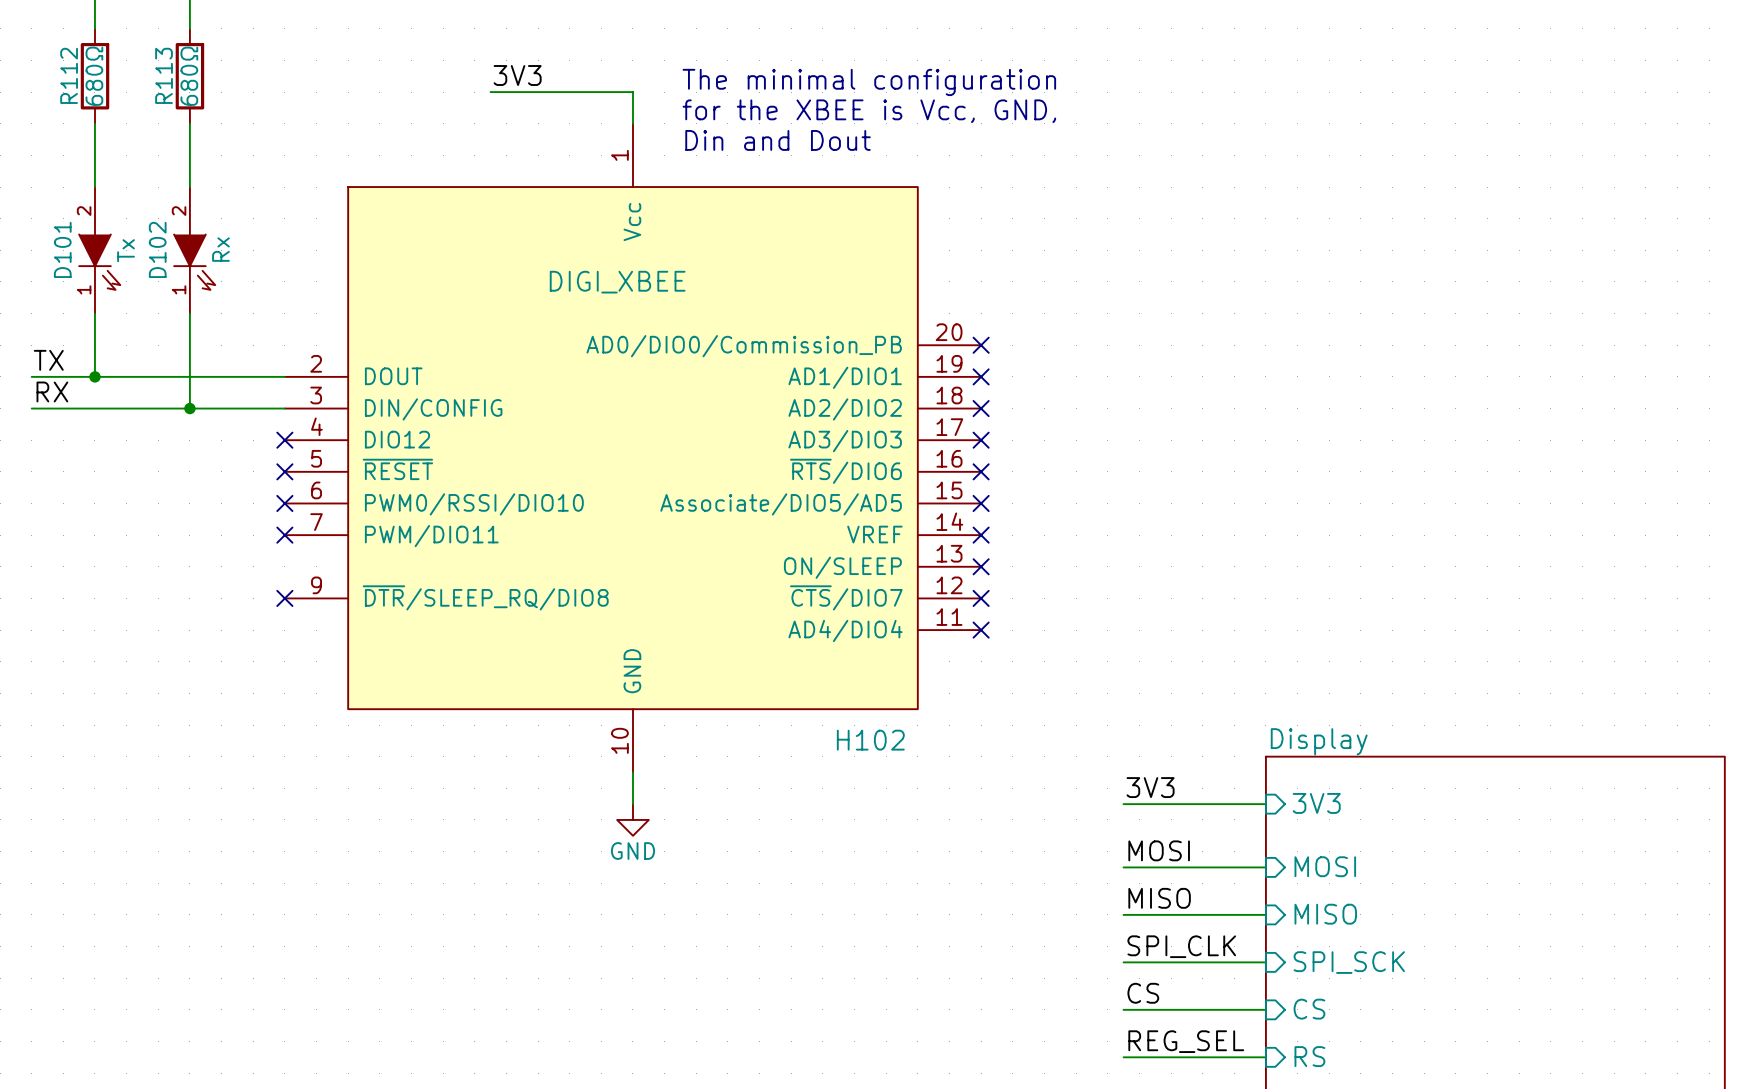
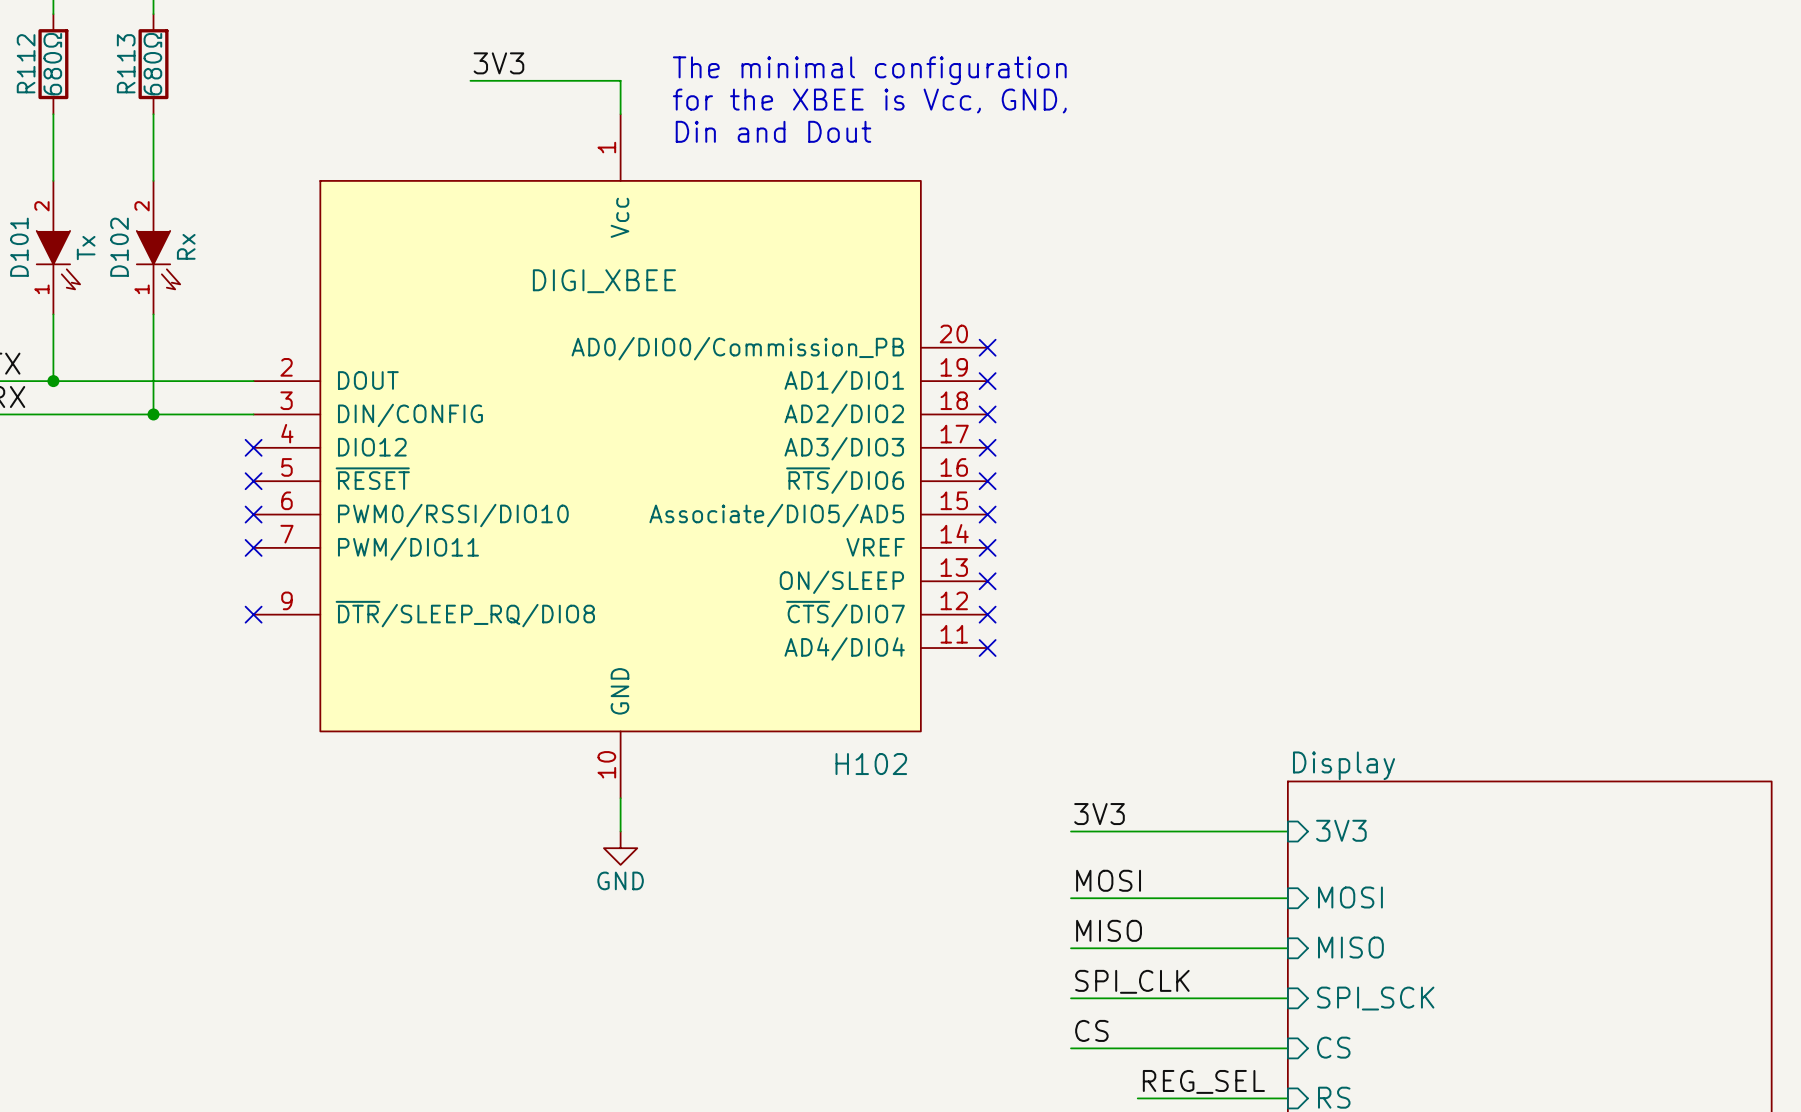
label position: 3V3 (1150, 787) -> 3V3 (1099, 814)
wire: none -> (1071, 831) (1137, 831)
label position: MOSI (1159, 850) -> MOSI (1108, 880)
wire: none -> (1071, 898) (1137, 898)
label position: MISO (1159, 898) -> MISO (1109, 930)
wire: none -> (1071, 948) (1137, 948)
label position: SPI_CLK (1181, 946) -> SPI_CLK (1132, 981)
wire: none -> (1071, 998) (1137, 998)
label position: CS (1143, 993) -> CS (1091, 1030)
wire: none -> (1071, 1048) (1137, 1048)

